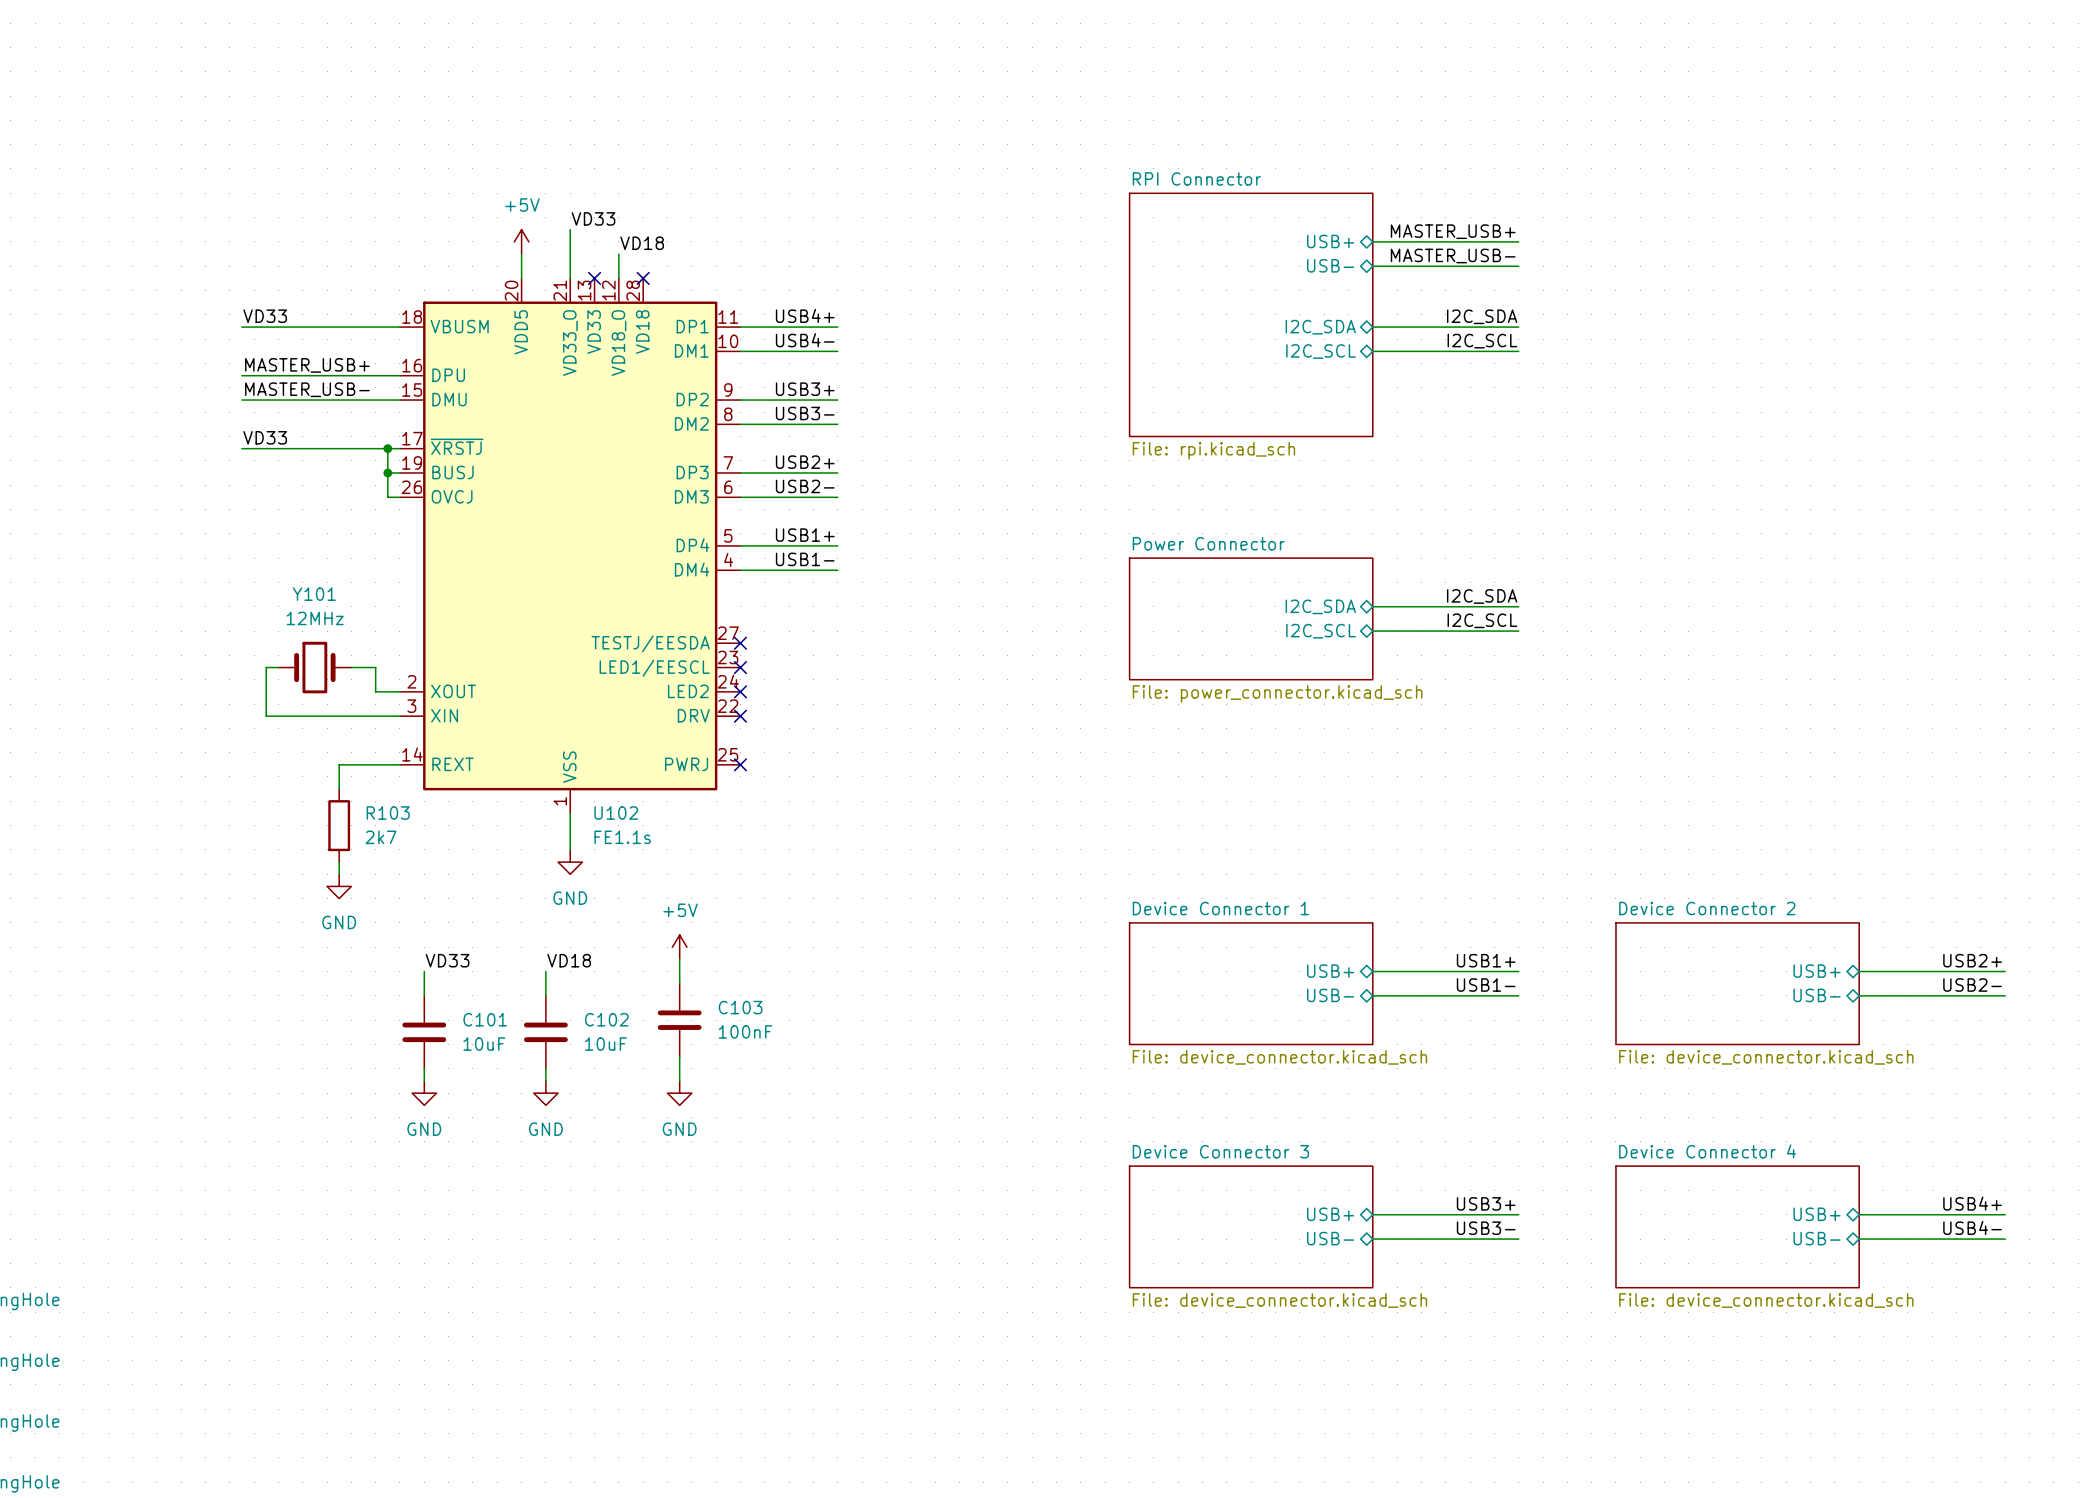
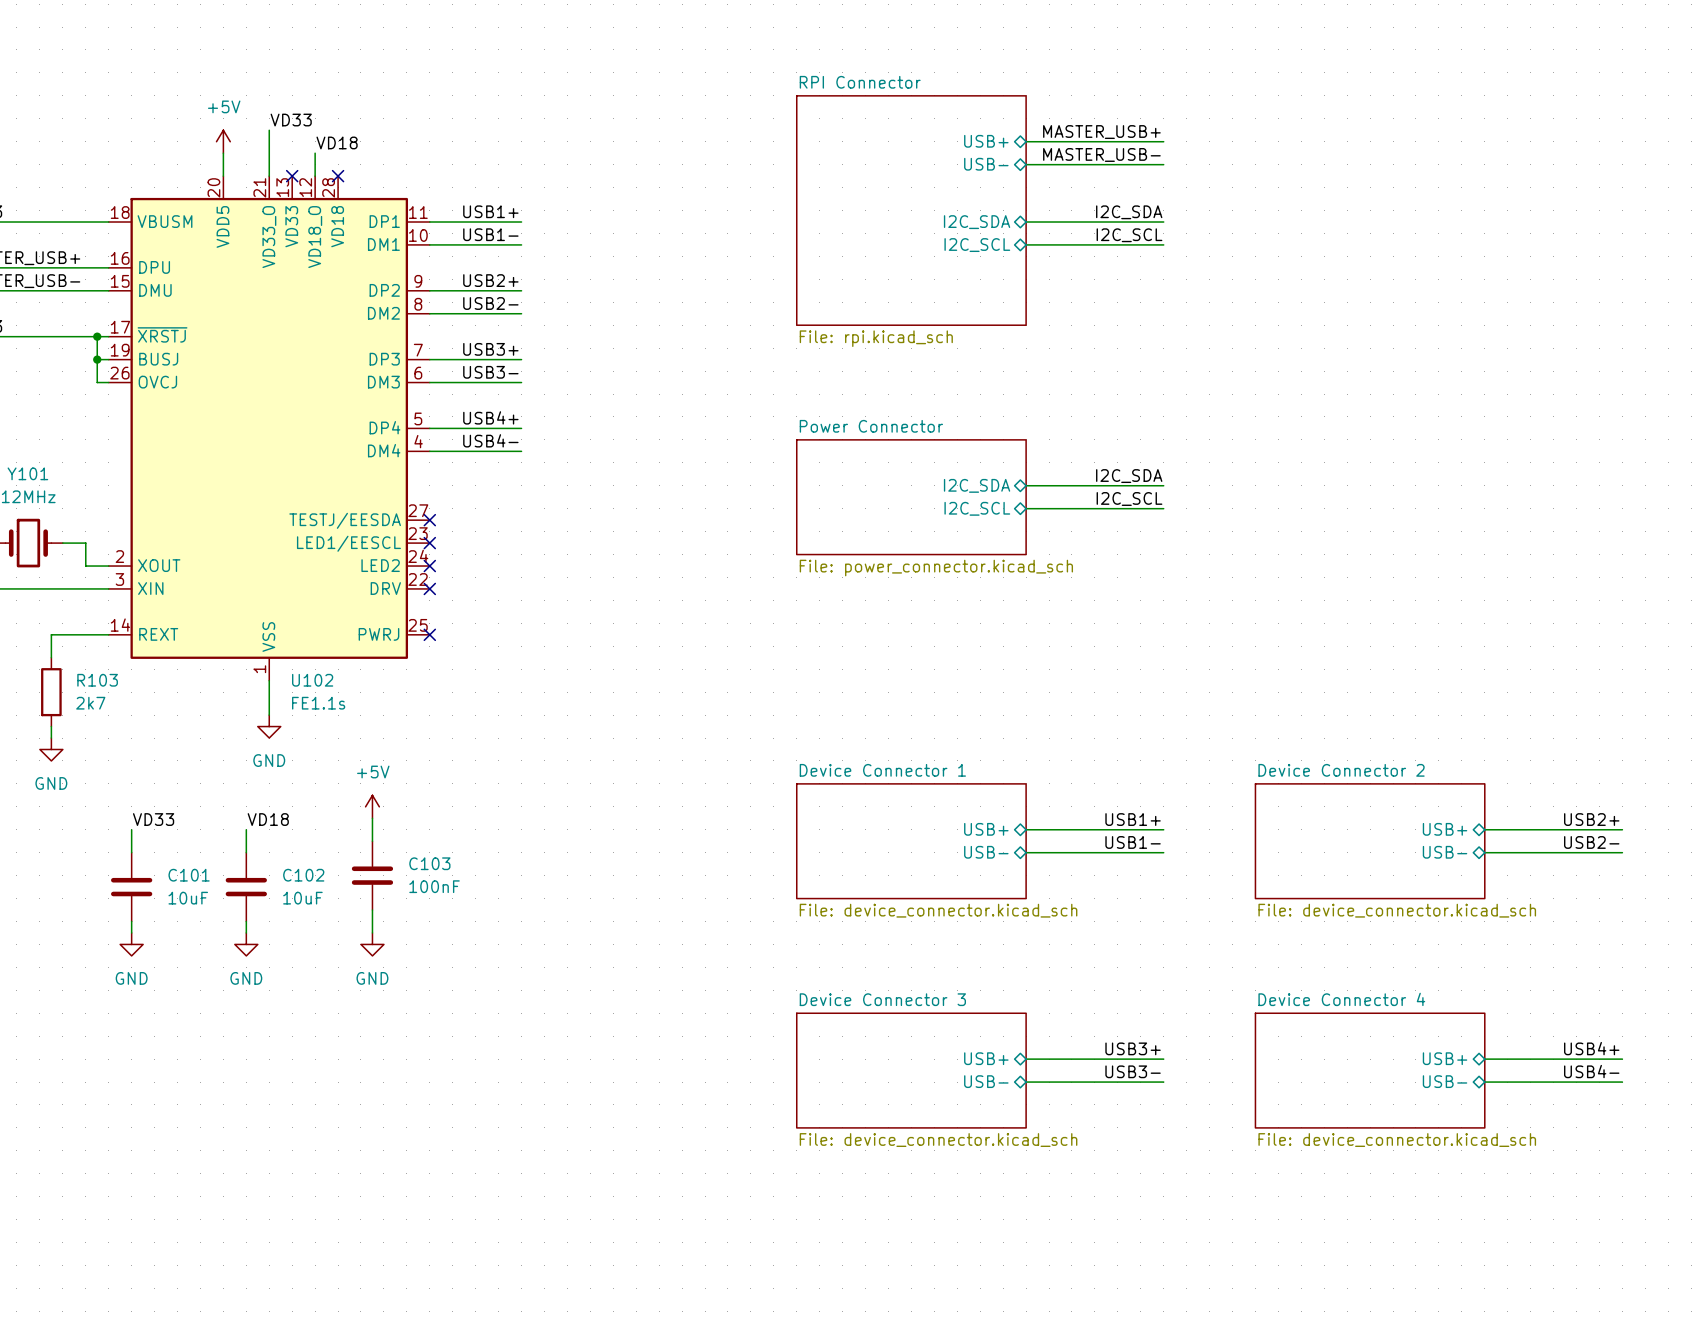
label: USB4+ (805, 315) -> USB1+ (490, 211)
label: USB4- (805, 340) -> USB1- (490, 234)
label: USB3+ (805, 389) -> USB2+ (490, 280)
label: USB3- (805, 413) -> USB2- (490, 303)
label: USB2+ (805, 462) -> USB3+ (490, 349)
label: USB2- (805, 486) -> USB3- (490, 372)
label: USB1+ (805, 535) -> USB4+ (490, 417)
label: USB1- (805, 559) -> USB4- (490, 440)

